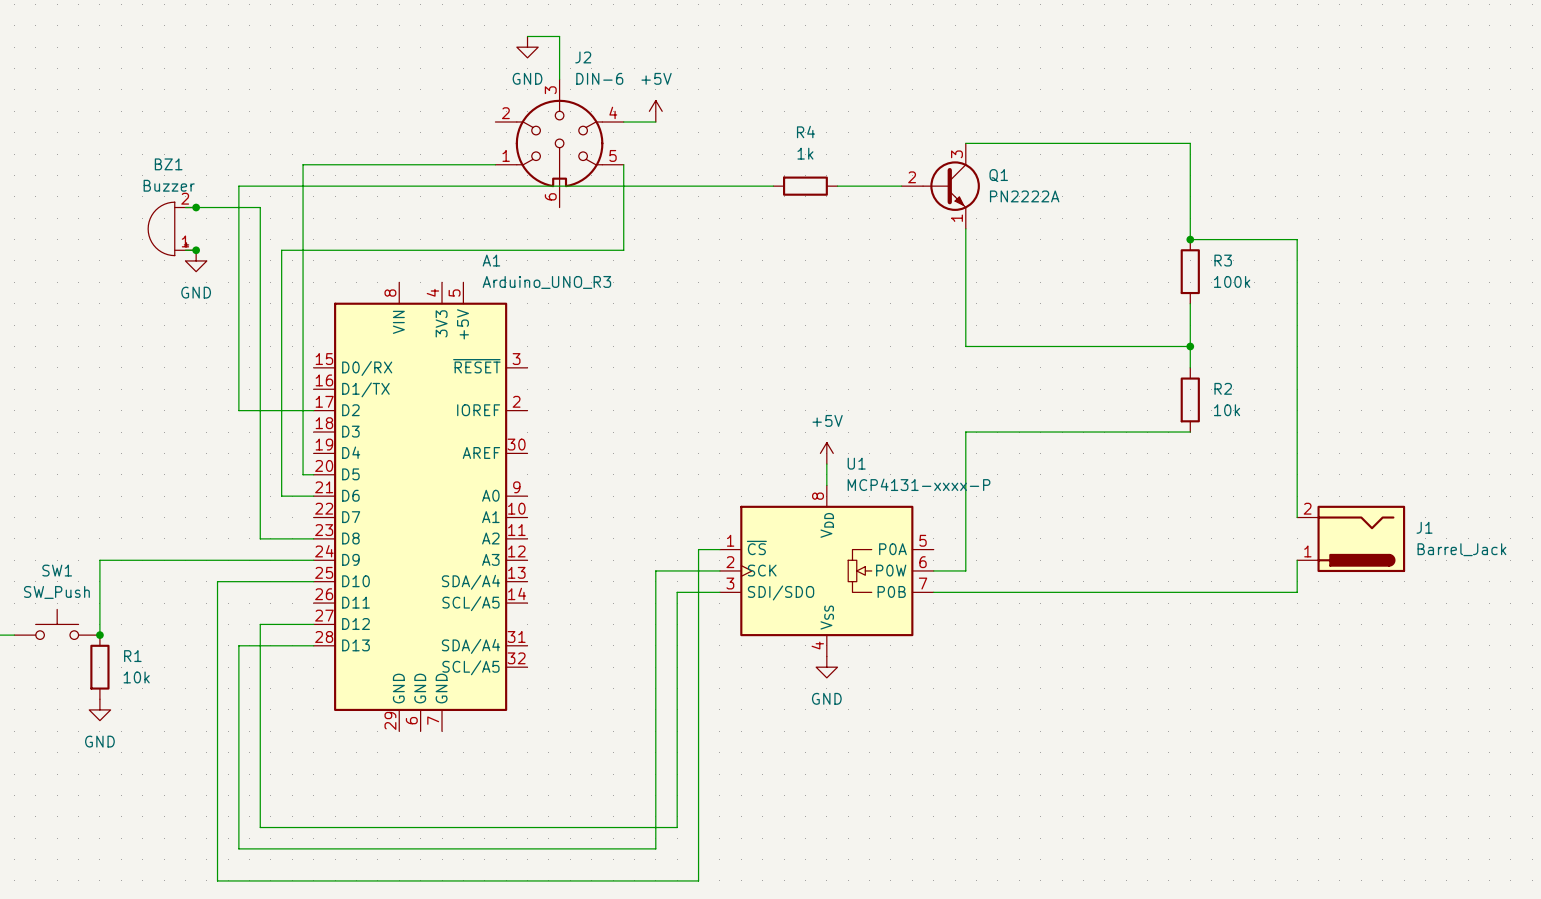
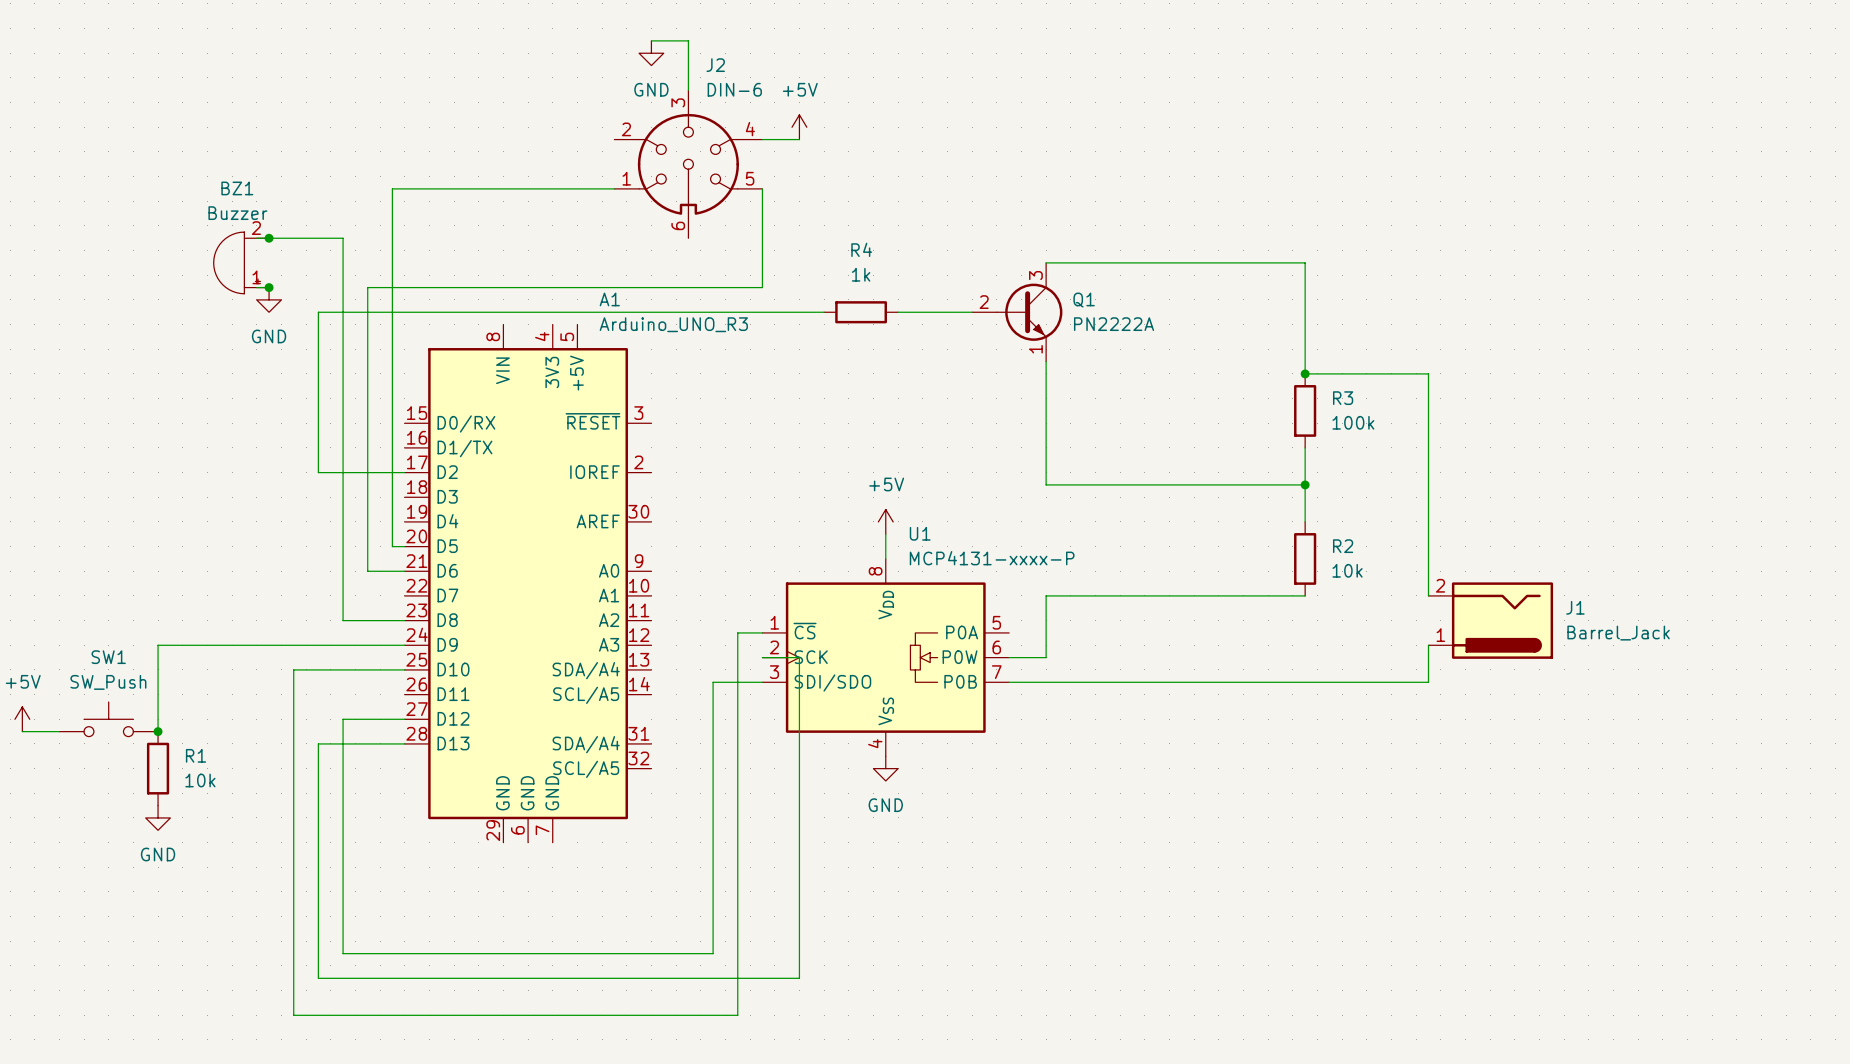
wire: (965, 143) (1190, 143) (1190, 239) (1297, 239) (1297, 517) -> none
wire: (773, 186) (238, 186) (238, 271) -> (824, 312) (318, 312)
R4 position: (805, 186) -> (861, 312)
wire: (837, 186) (901, 186) -> (898, 312) (972, 312)
Q1 position: (940, 186) -> (1017, 312)
wire: none -> (1046, 262) (1305, 262) (1305, 373) (1428, 373) (1428, 595)
wire: (965, 228) (965, 346) (1190, 346) -> none
junction: (1190, 239) -> none
R3 position: (1190, 271) -> (1305, 410)
wire: (1190, 303) (1190, 367) -> (1305, 447) (1305, 521)
wire: none -> (1046, 361) (1046, 484) (1305, 484)
junction: none -> (1305, 373)
junction: (1190, 346) -> none
R2 position: (1190, 399) -> (1305, 558)
junction: none -> (1305, 484)
wire: (1190, 432) (965, 432) (965, 570) (933, 570) -> none
power symbol position: +5V (826, 453) -> +5V (885, 521)
wire: (826, 464) (826, 485) -> (885, 534) (885, 558)
wire: none -> (1305, 595) (1046, 595) (1046, 657) (1009, 657)
J1 position: (1351, 538) -> (1490, 620)
wire: (719, 549) (698, 549) (698, 880) (602, 880) -> (762, 632) (737, 632) (737, 1015)
wire: (1297, 560) (1297, 592) (1200, 592) -> (1428, 645) (1428, 682)
U1 position: (826, 570) -> (885, 657)
wire: (719, 592) (677, 592) (677, 827) (580, 827) -> (762, 682) (713, 682) (713, 953)
power symbol position: GND (826, 667) -> GND (885, 768)

